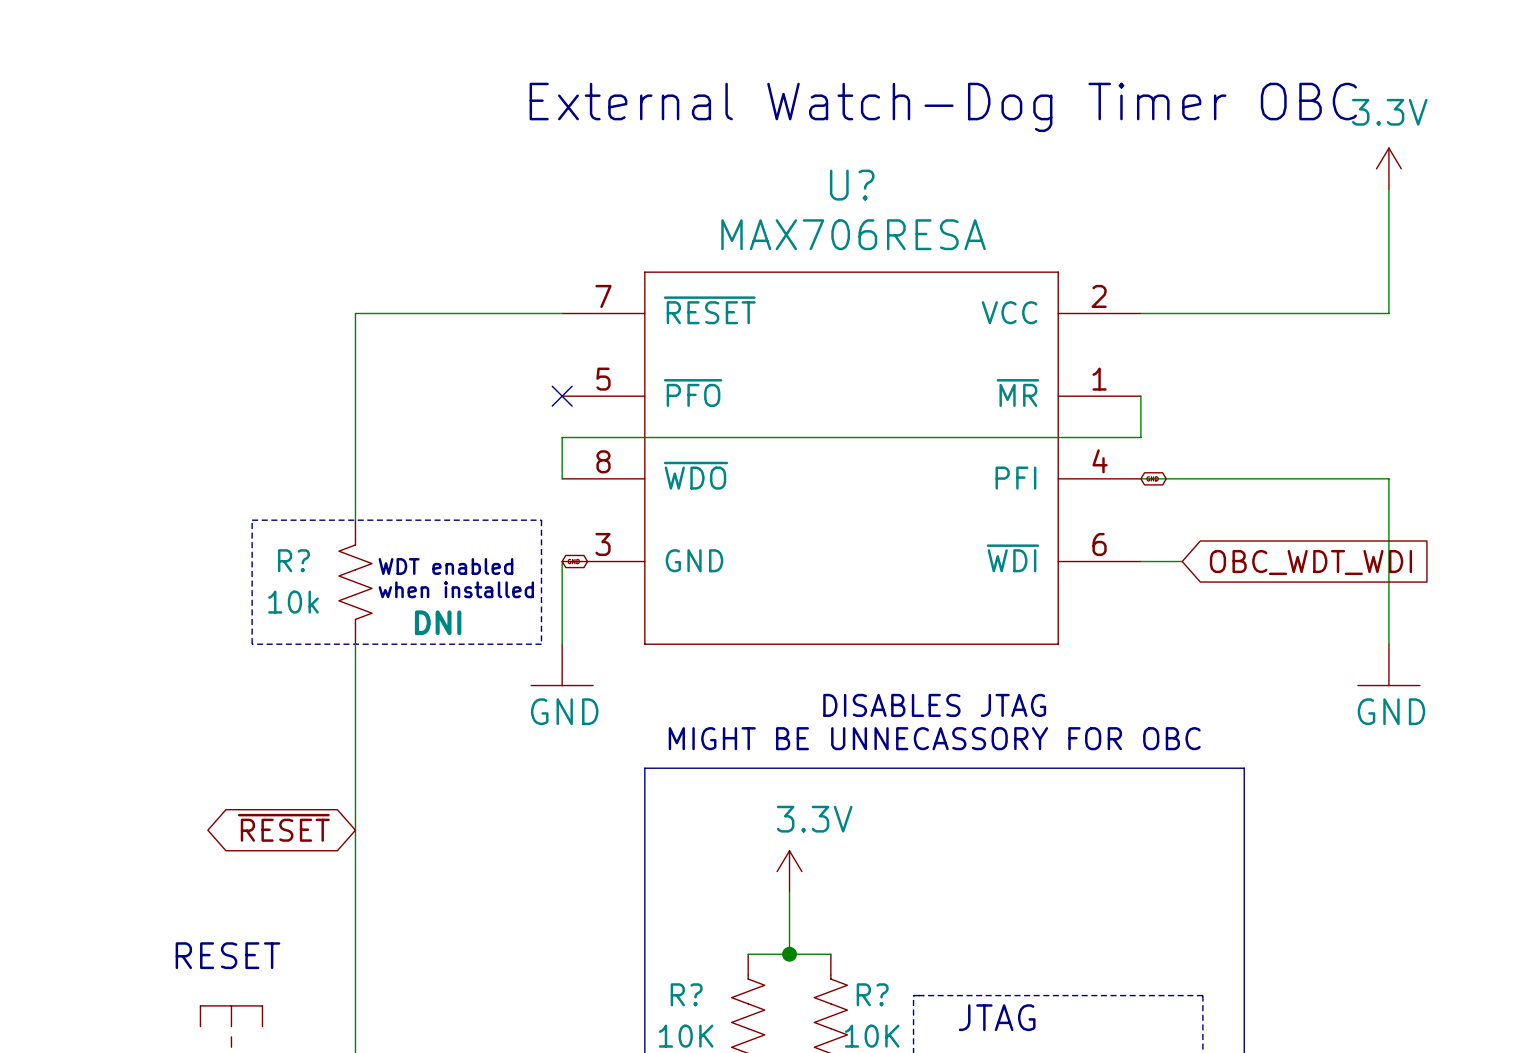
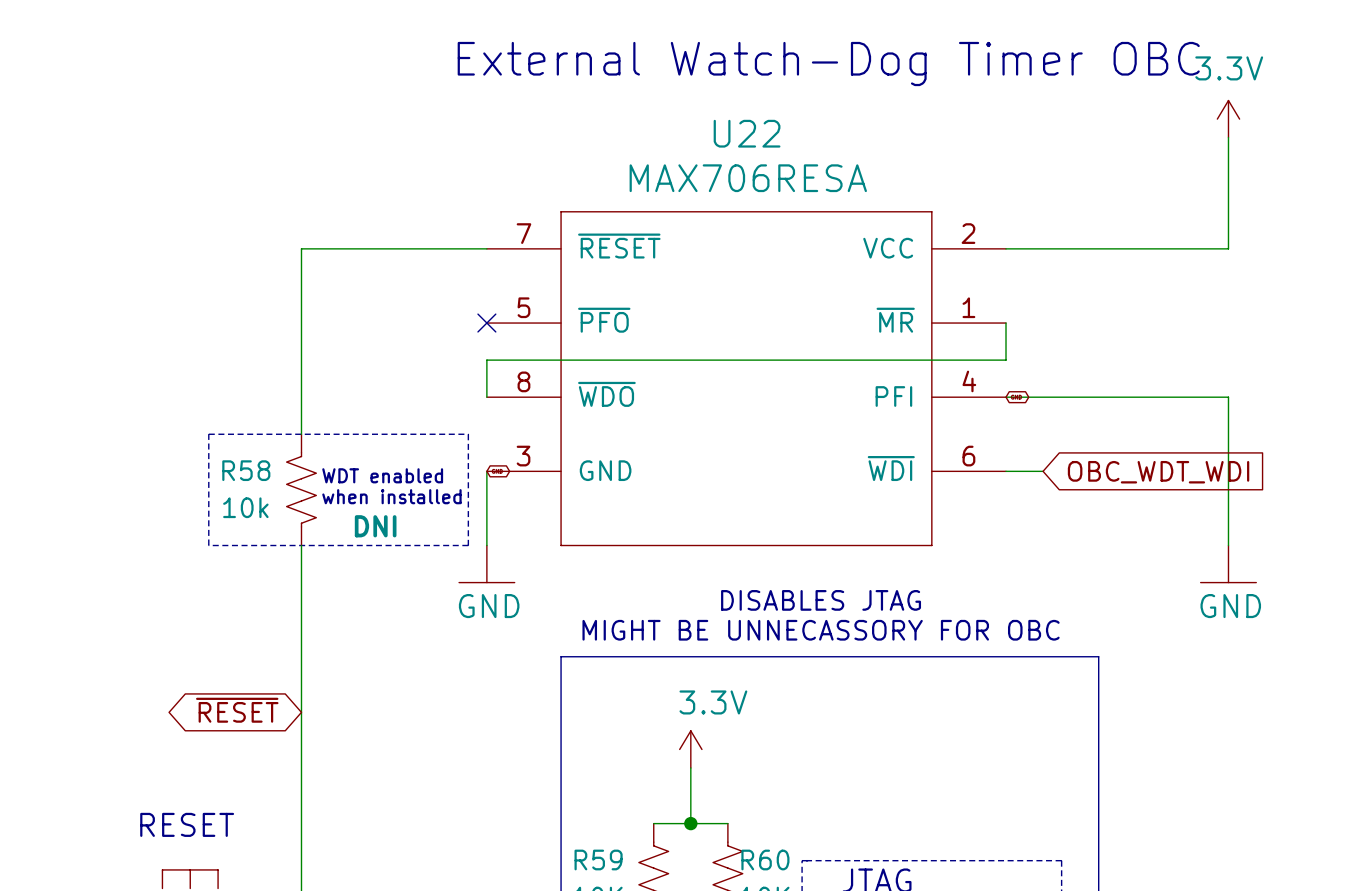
U? name: U? (852, 185) -> U22 (747, 133)
R? name: R? (293, 560) -> R58 (246, 470)
R? name: R? (686, 994) -> R59 (598, 859)
R? name: R? (872, 994) -> R60 (765, 859)

